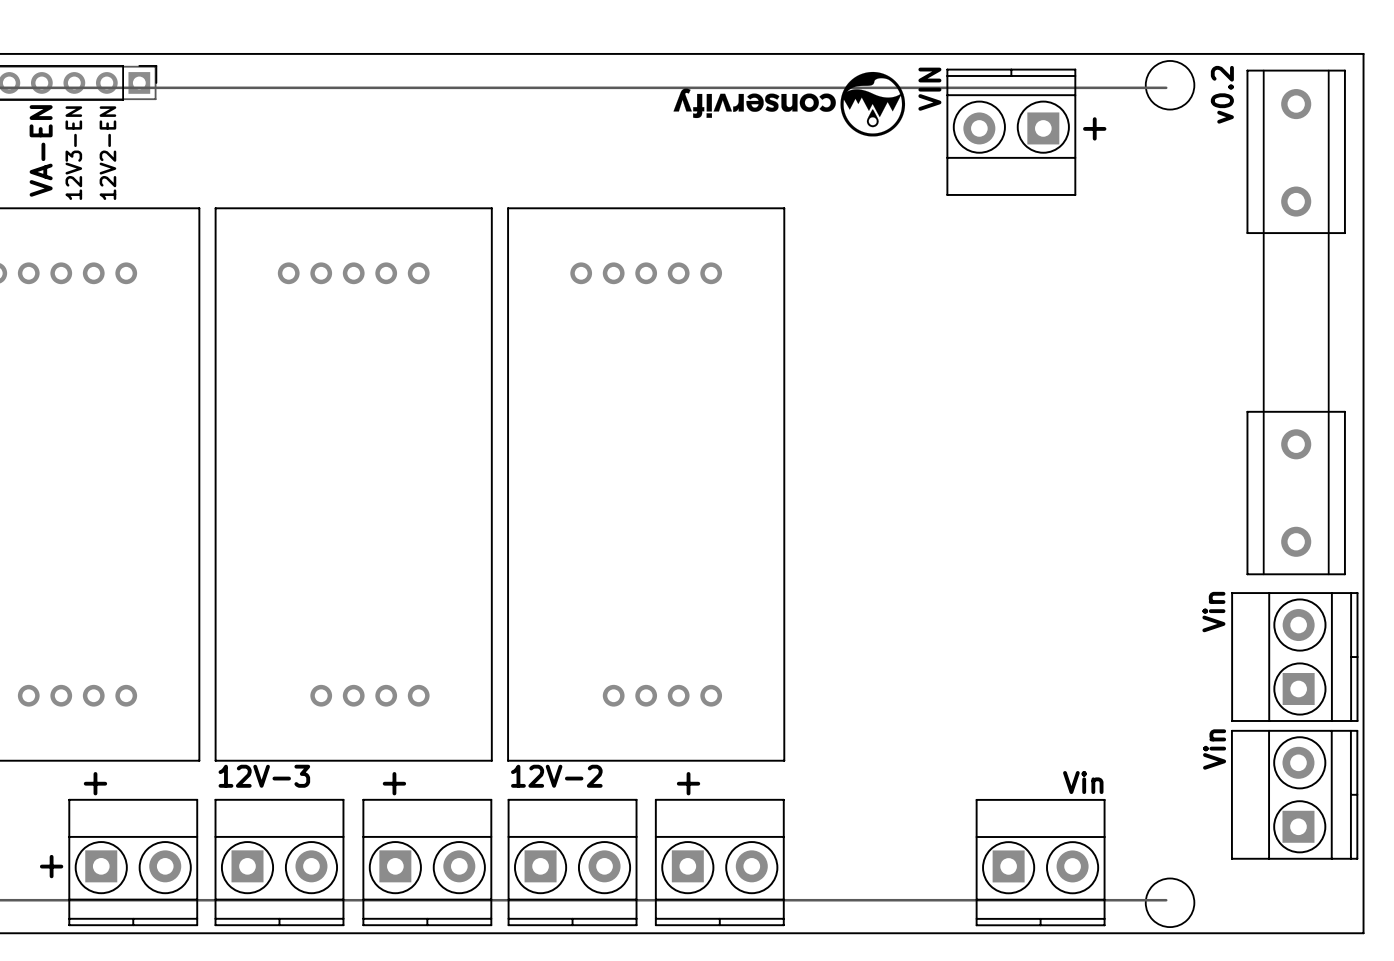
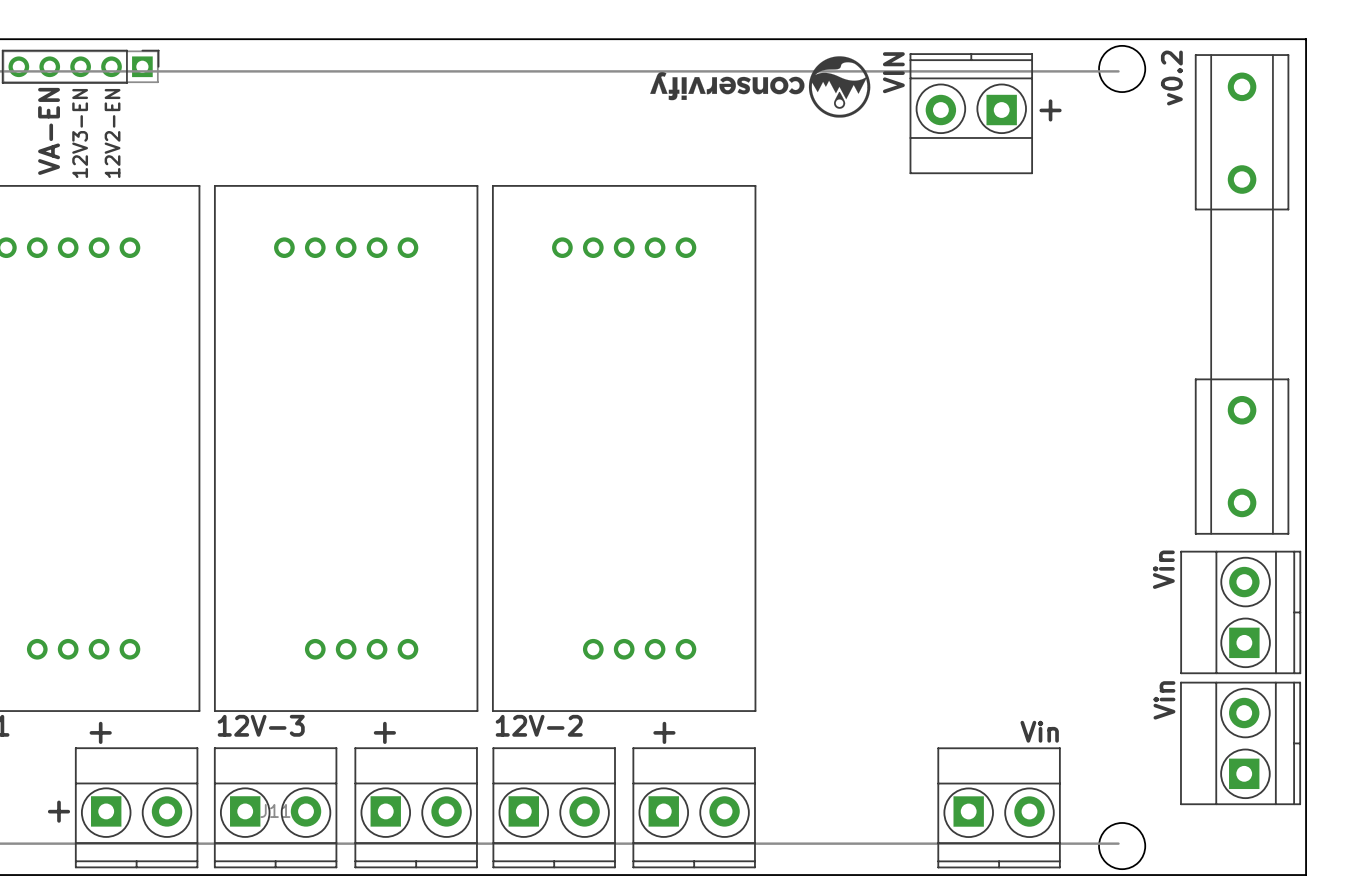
J11 name: none -> J11 (275, 810)

